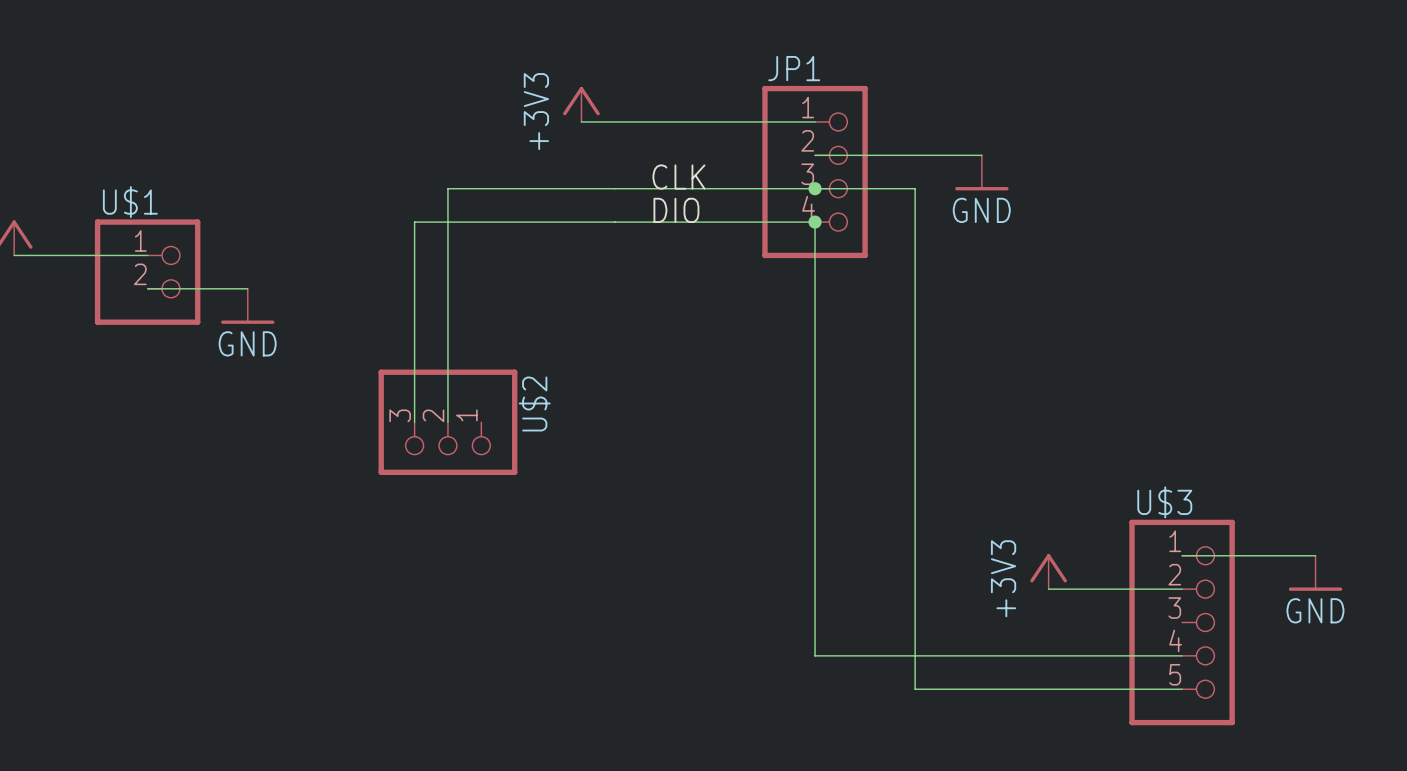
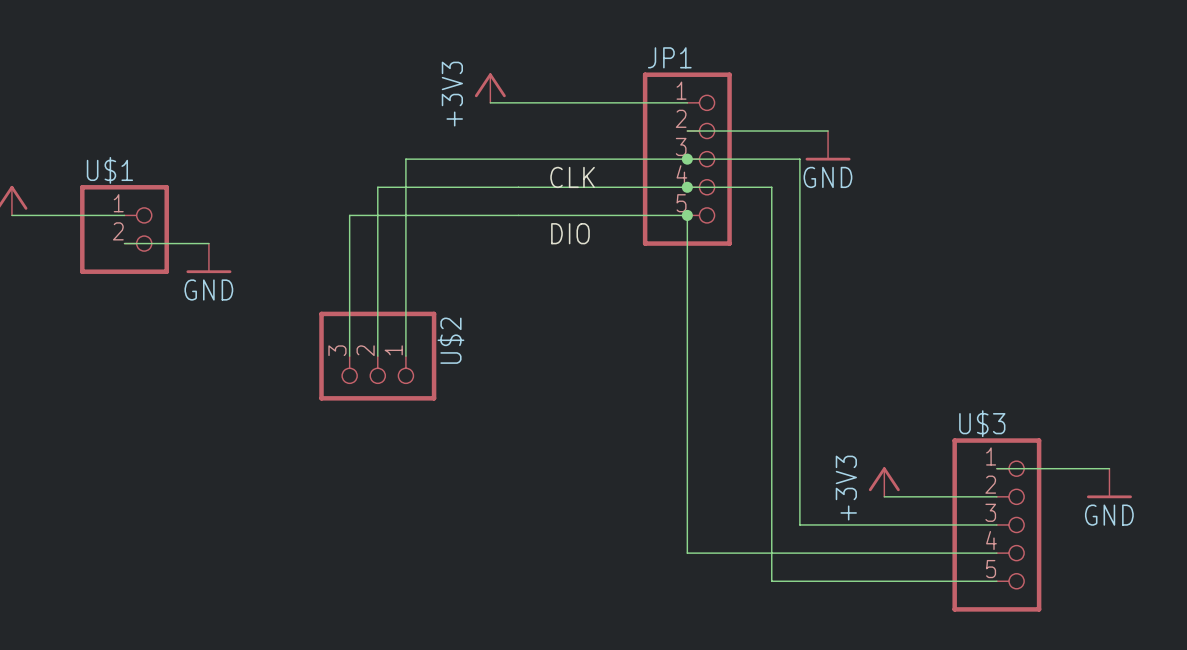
JP1 symbol: [762, 85, 868, 259] -> [642, 72, 732, 246]
label: CLK (678, 177) -> none
wire: (481, 188) (447, 188) (447, 222) (414, 222) (414, 255) -> (405, 159) (405, 356)
wire: (915, 188) (915, 222) -> (687, 187) (771, 187)
wire: none -> (771, 159) (799, 159) (799, 524) (996, 524)
label: DIO (676, 210) -> CLK (572, 177)
wire: (815, 222) (815, 255) -> (349, 215) (687, 215)
junction: none -> (687, 215)
label: none -> DIO (570, 233)

